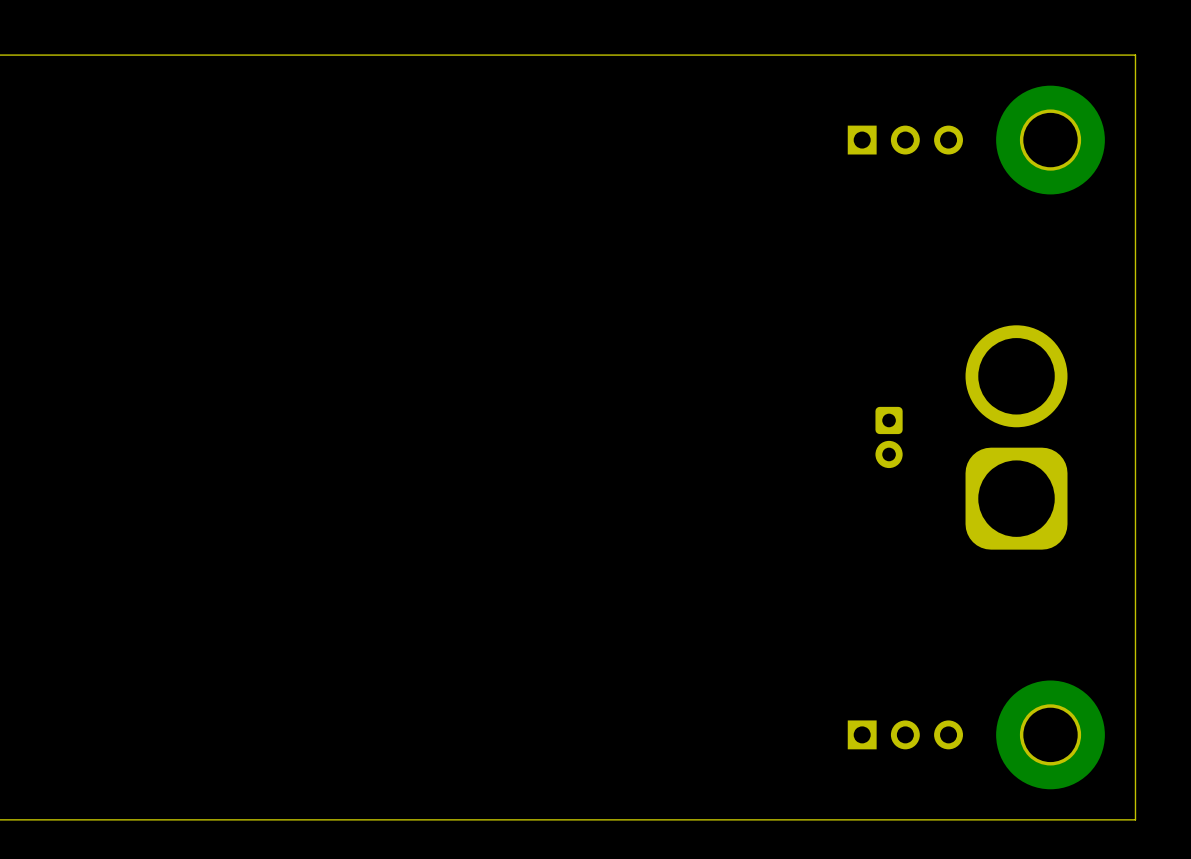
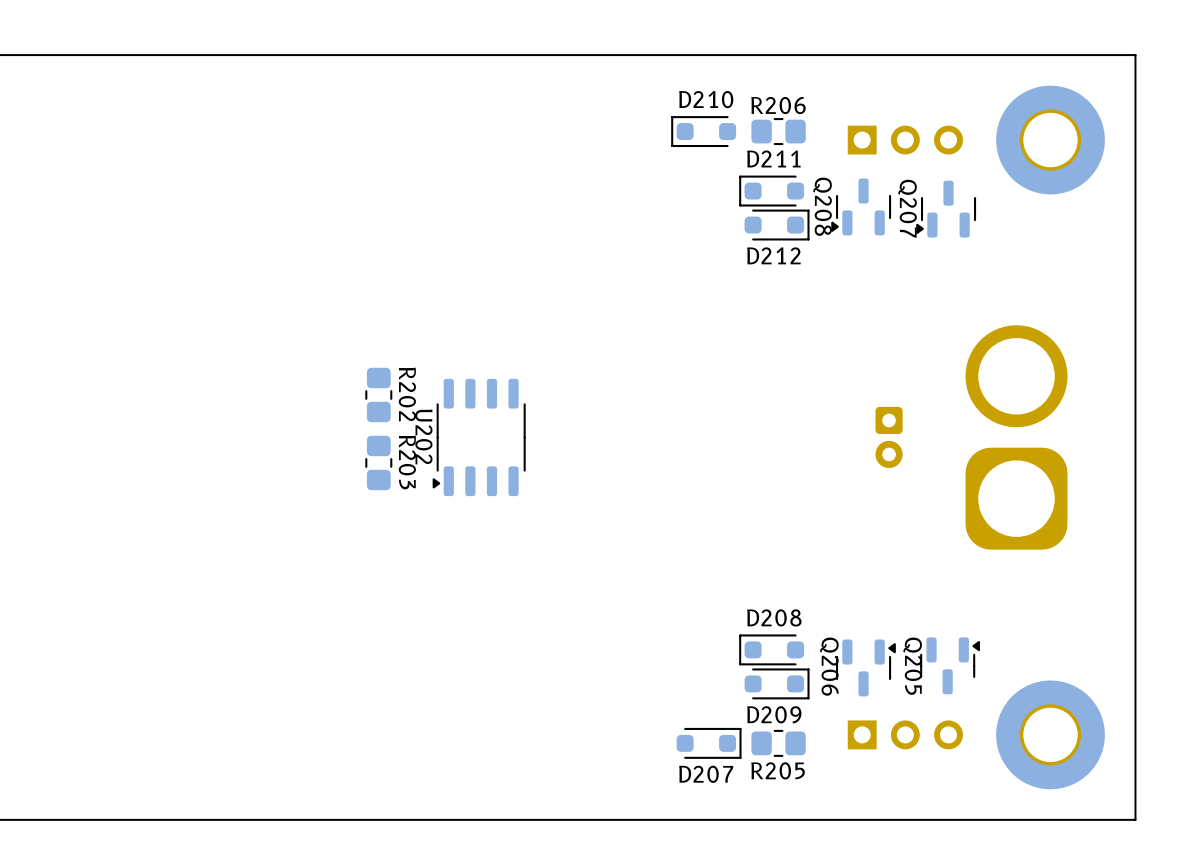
D210: none -> (703, 131)
R206: none -> (778, 131)
D211: none -> (771, 191)
Q208: none -> (861, 206)
Q207: none -> (946, 209)
D212: none -> (777, 225)
R202: none -> (378, 394)
U202: none -> (479, 437)
R203: none -> (378, 462)
D208: none -> (771, 649)
Q205: none -> (950, 665)
Q206: none -> (865, 667)
D209: none -> (777, 683)
D207: none -> (709, 743)
R205: none -> (778, 743)

